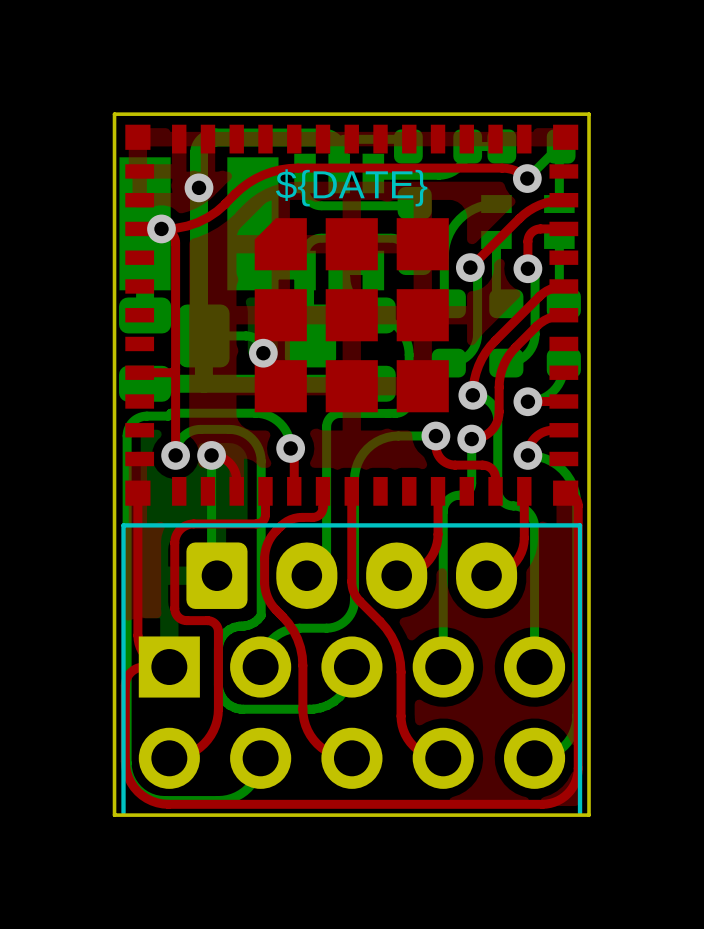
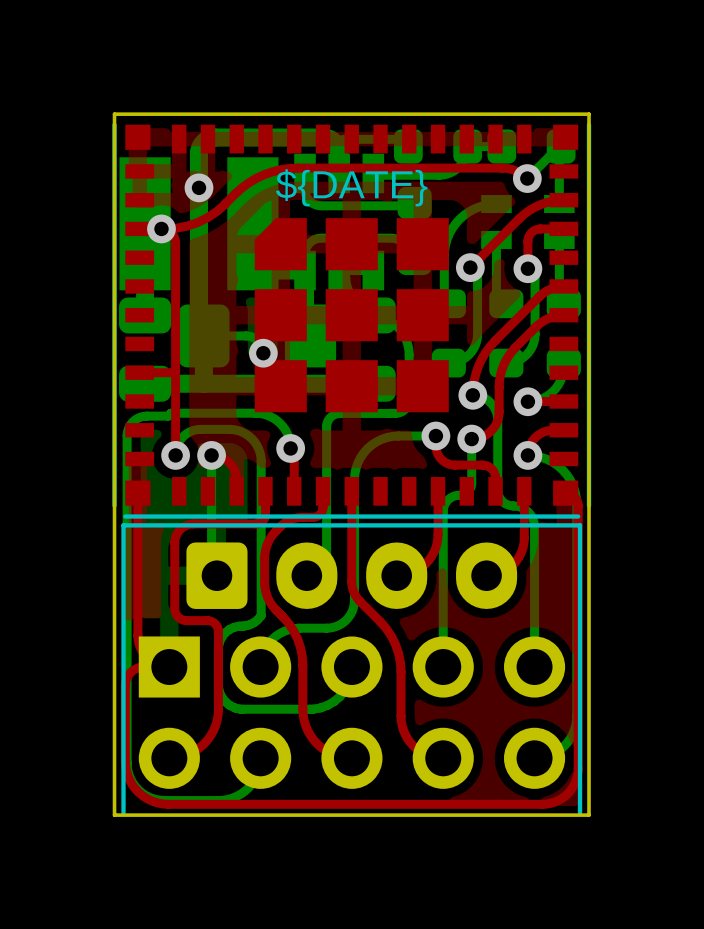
part footprint: [125, 124, 579, 506] -> [112, 122, 592, 519]

